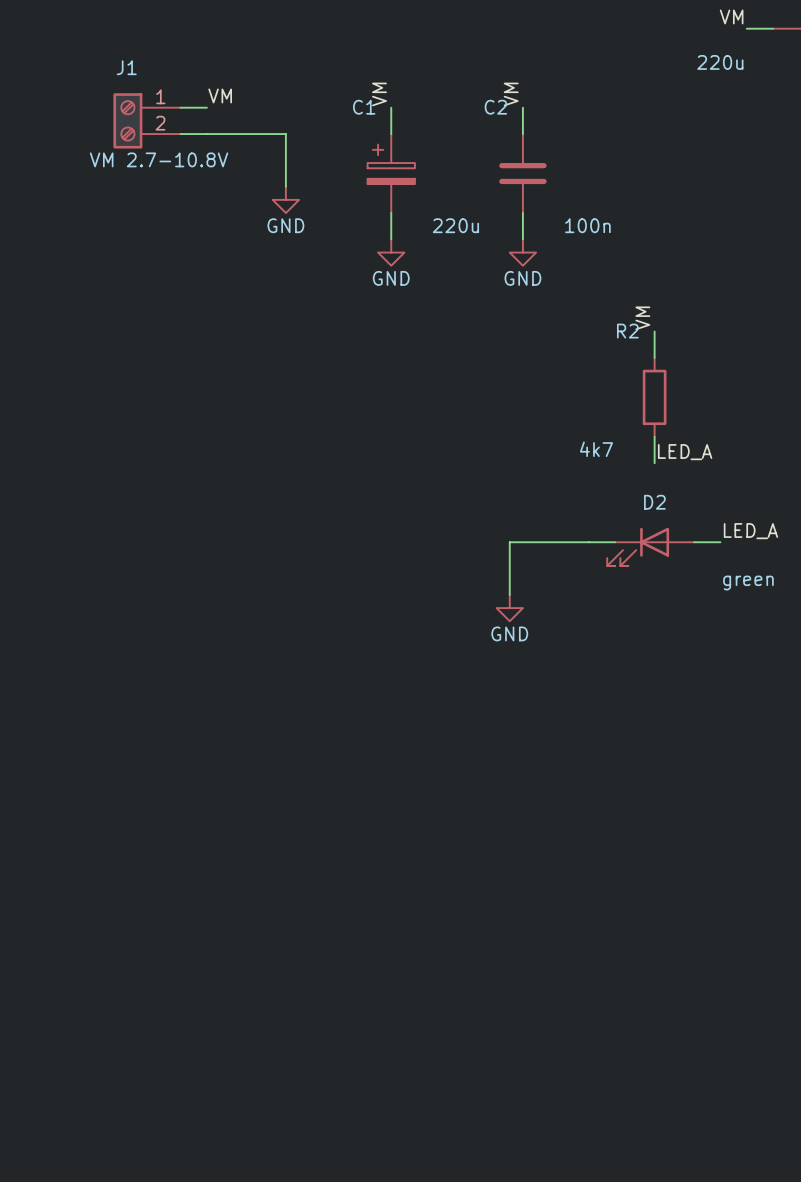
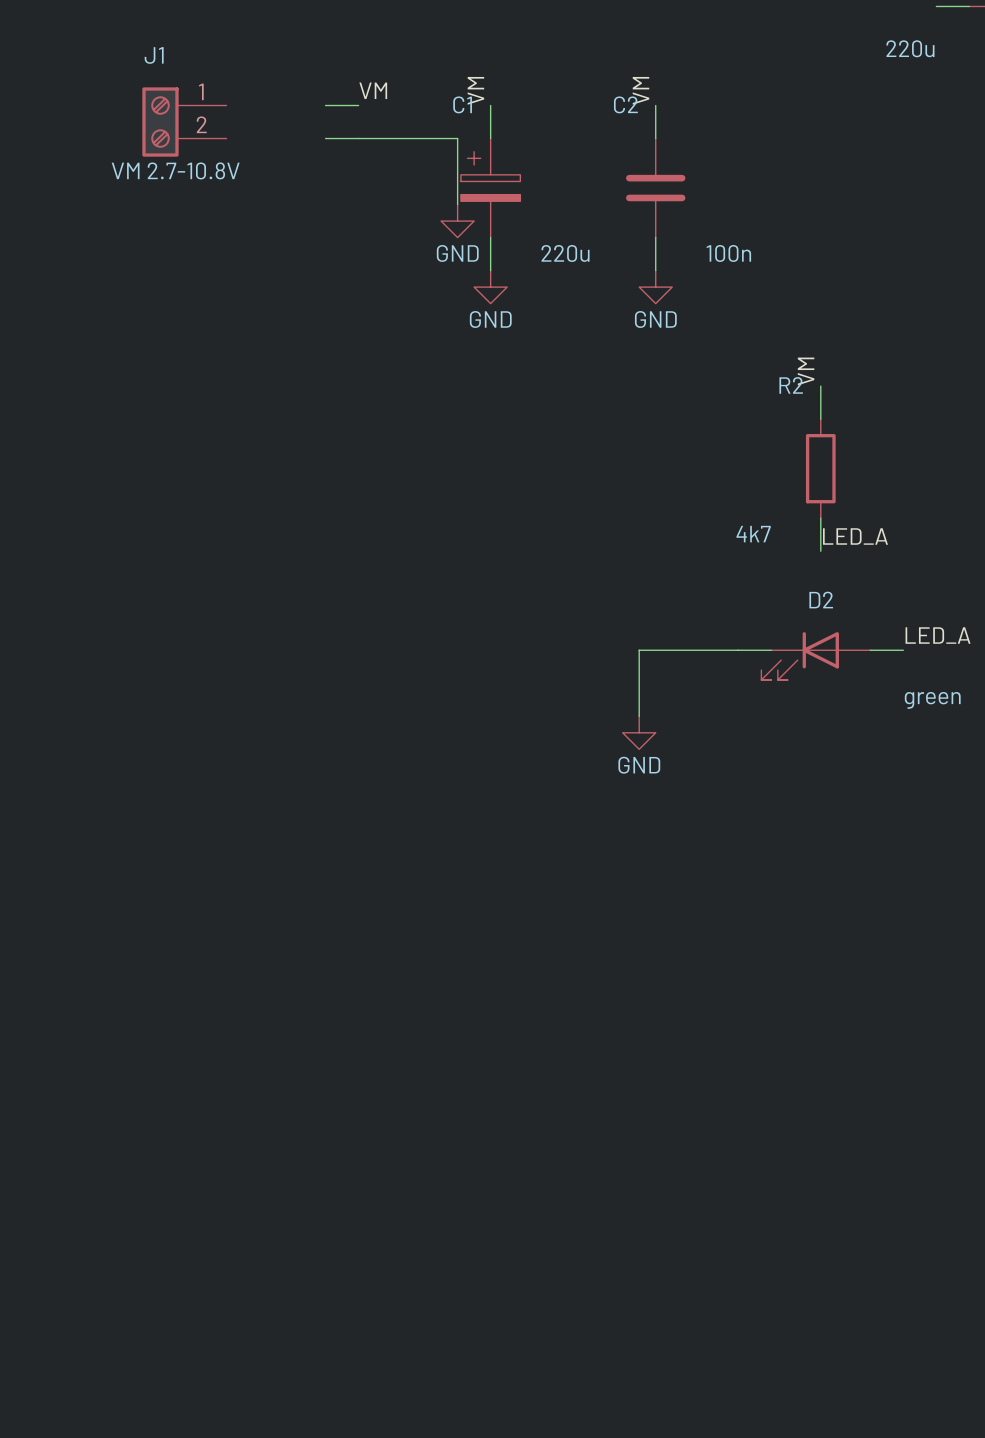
label position: VM (220, 95) -> VM (373, 90)
wire: (180, 107) (206, 107) -> (325, 105) (358, 105)
wire: (180, 134) (259, 134) -> none
wire: (285, 134) (285, 186) -> (358, 138) (457, 138) (457, 204)
power symbol position: GND (285, 199) -> GND (457, 221)

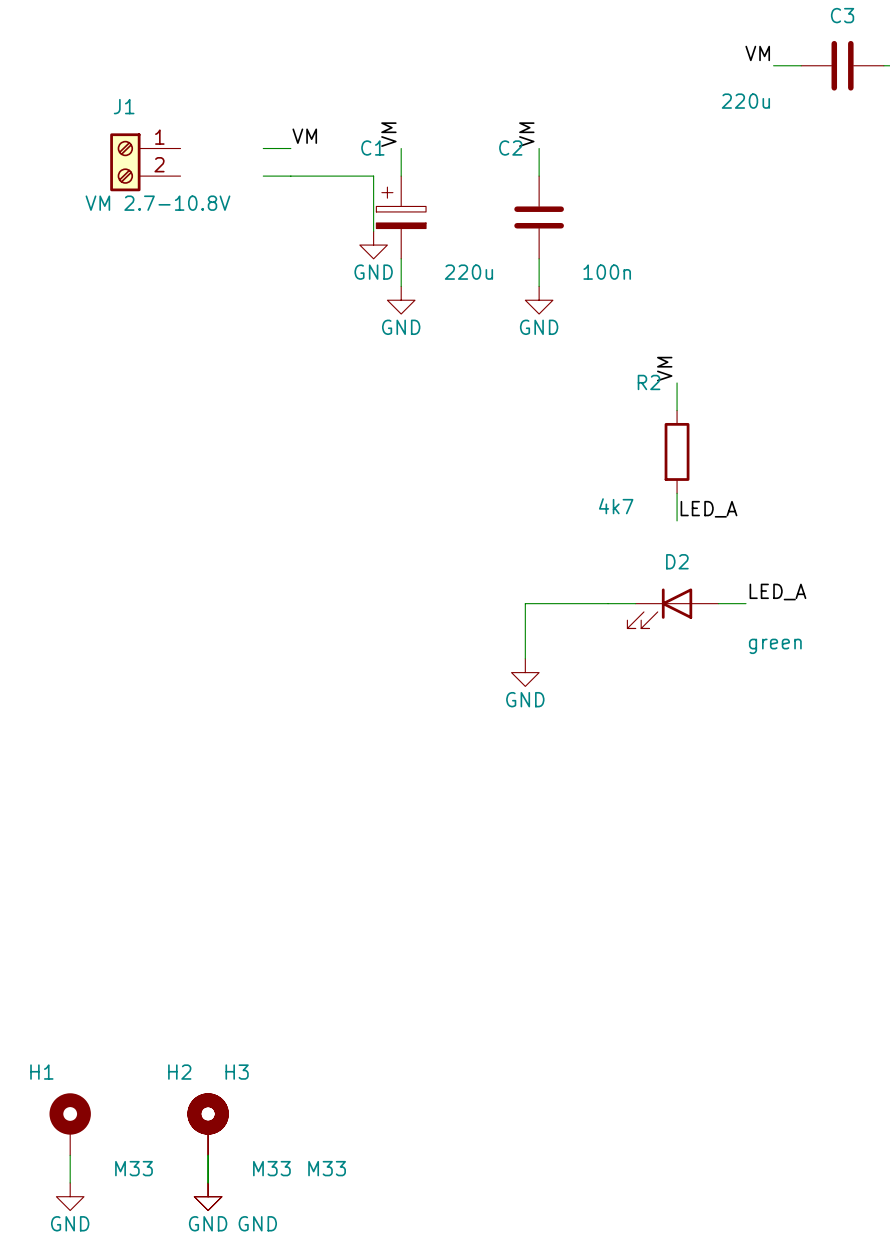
H1: none -> M33 (70, 1124)
H2: none -> M33 (208, 1124)
H3: none -> M33 (208, 1124)
wire: none -> (70, 1155) (70, 1182)
wire: none -> (208, 1155) (208, 1182)
power symbol: none -> GND (70, 1196)
power symbol: none -> GND (208, 1196)
power symbol: none -> GND (208, 1196)

